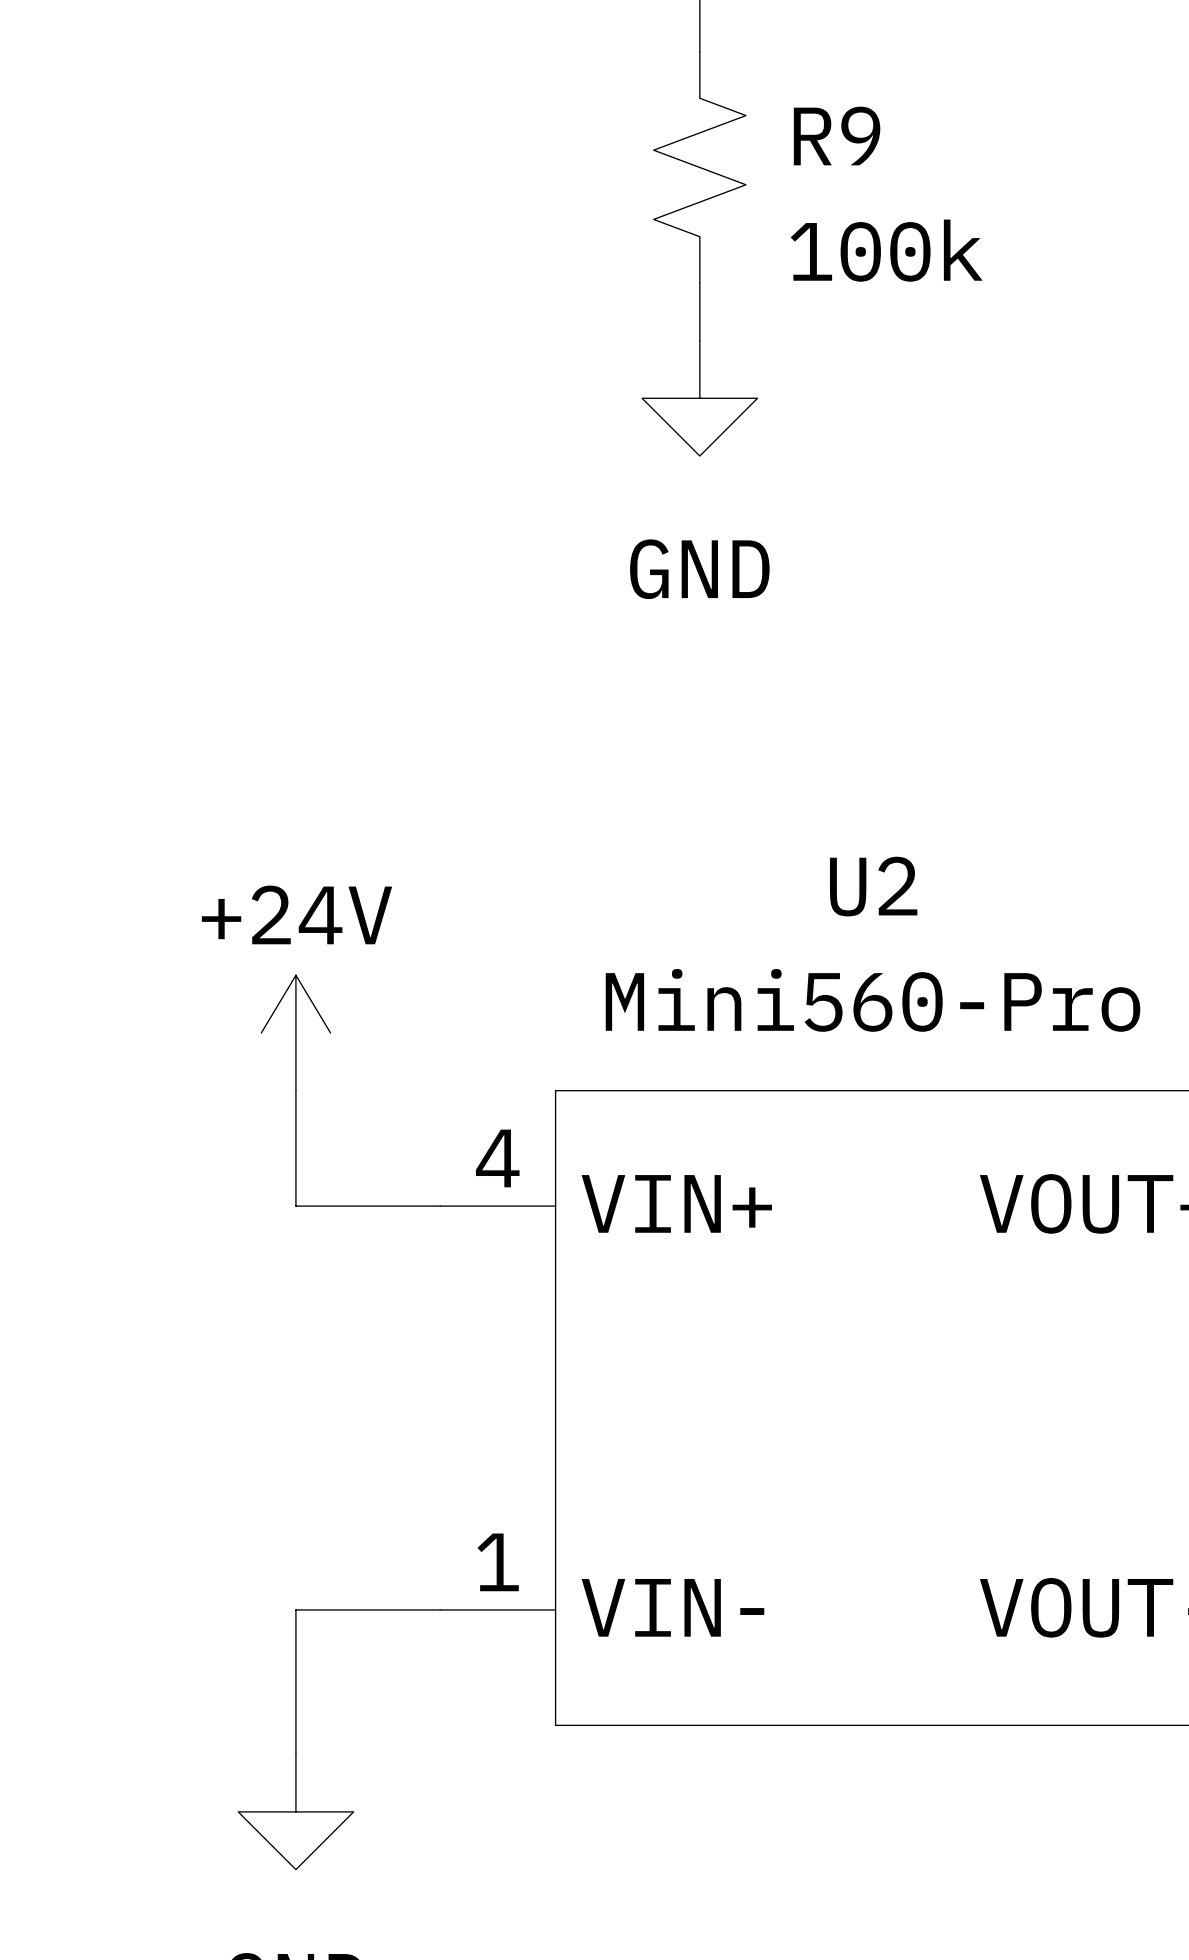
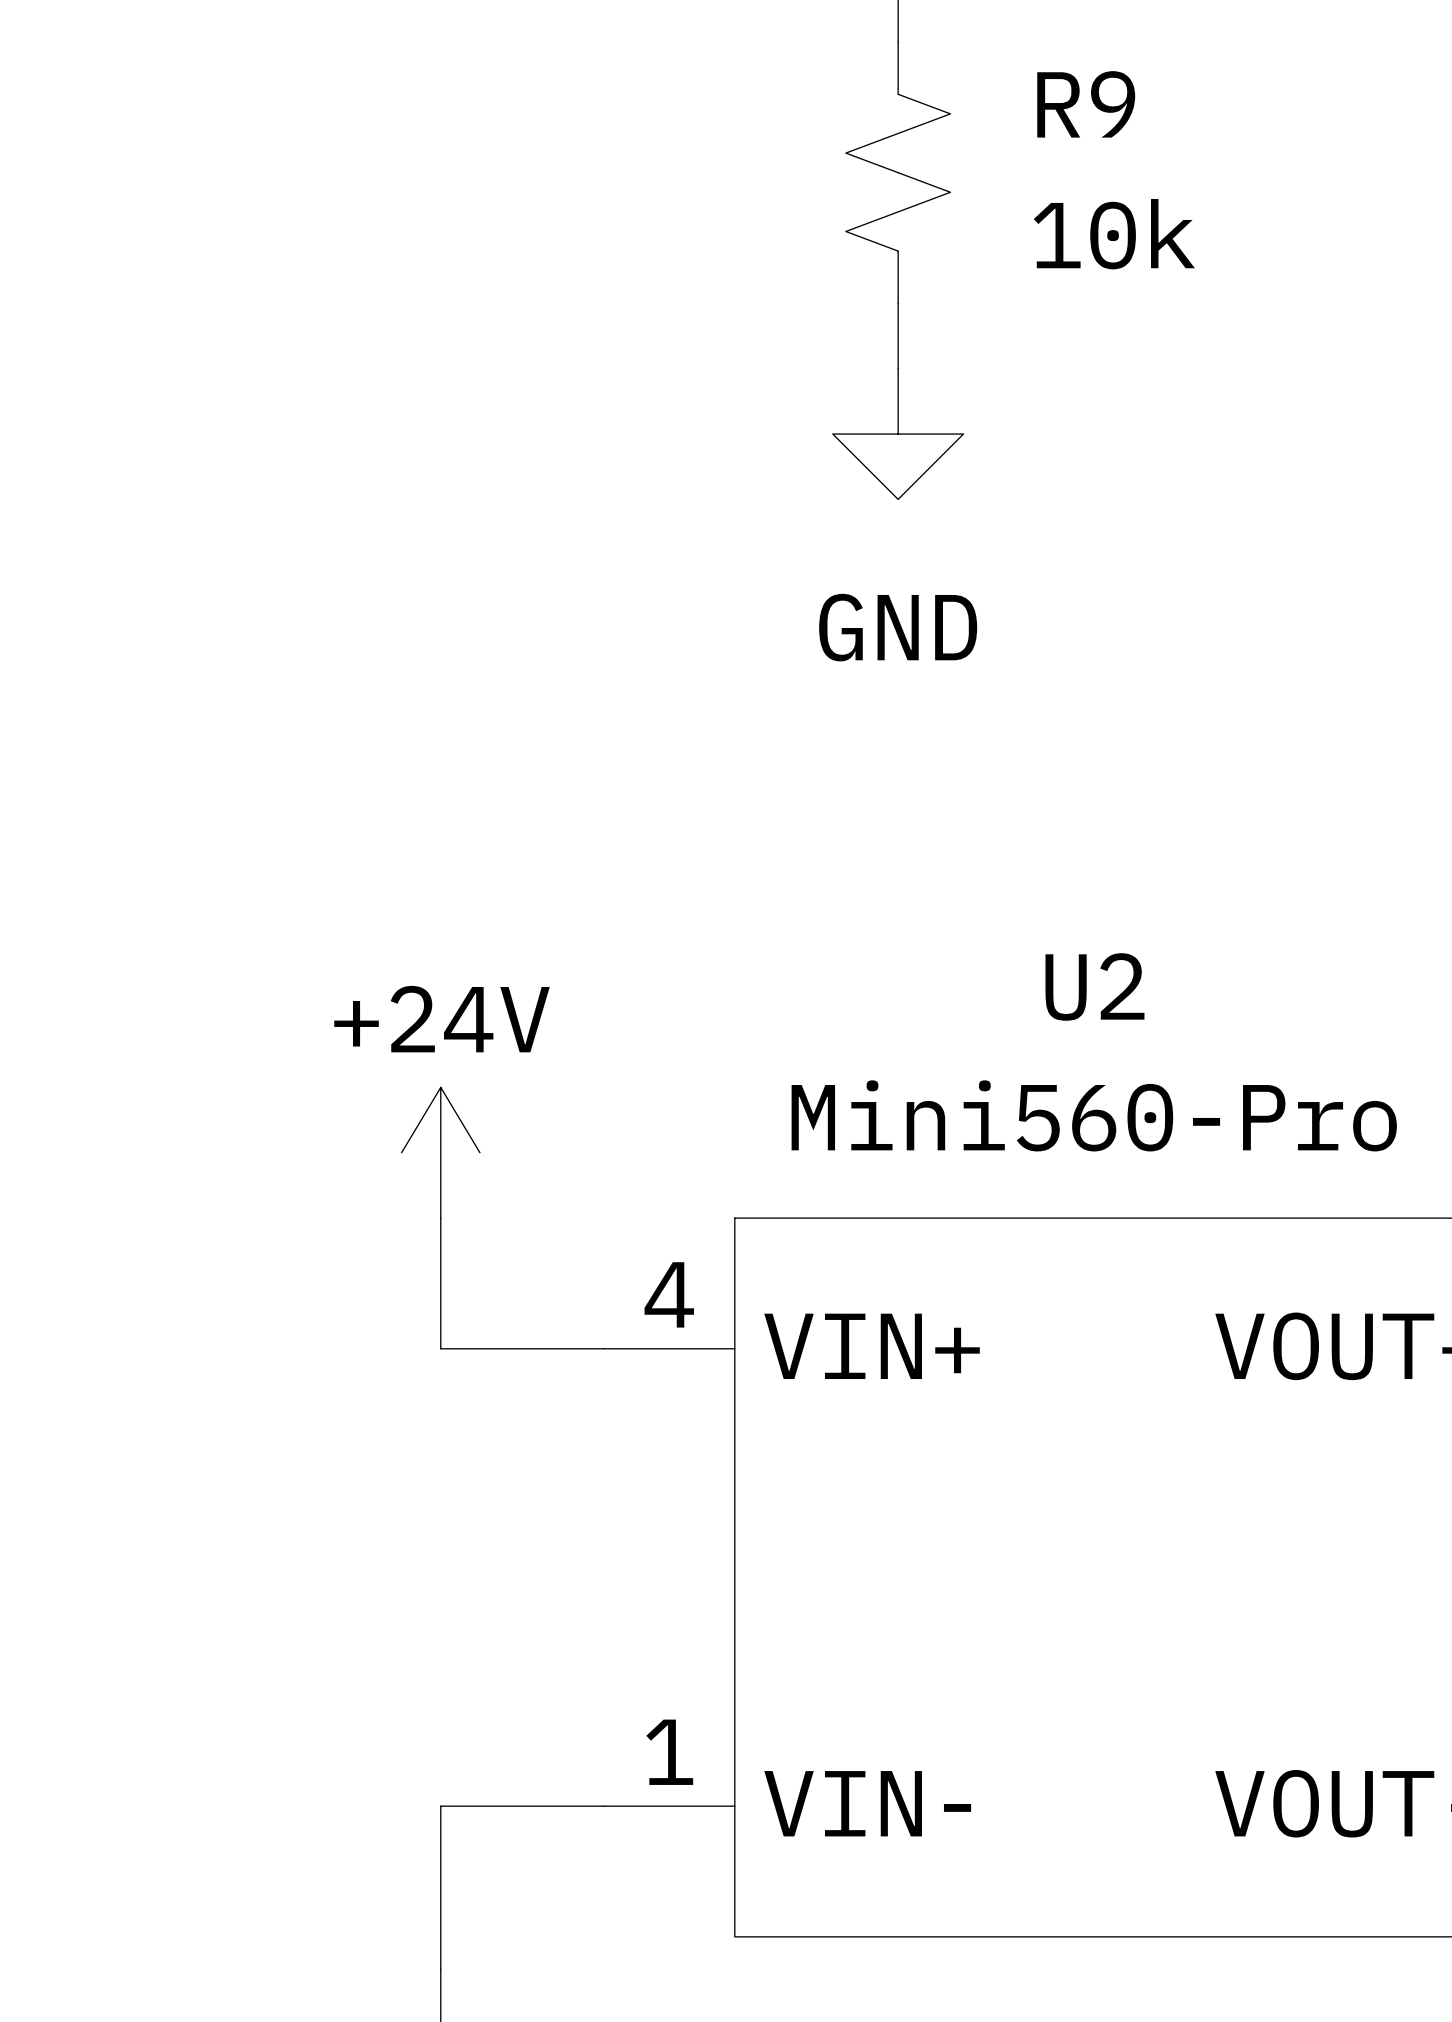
R9 name position: R9 (837, 135) -> R9 (1086, 104)
R9 value: 100k (886, 250) -> 10k (1114, 234)

